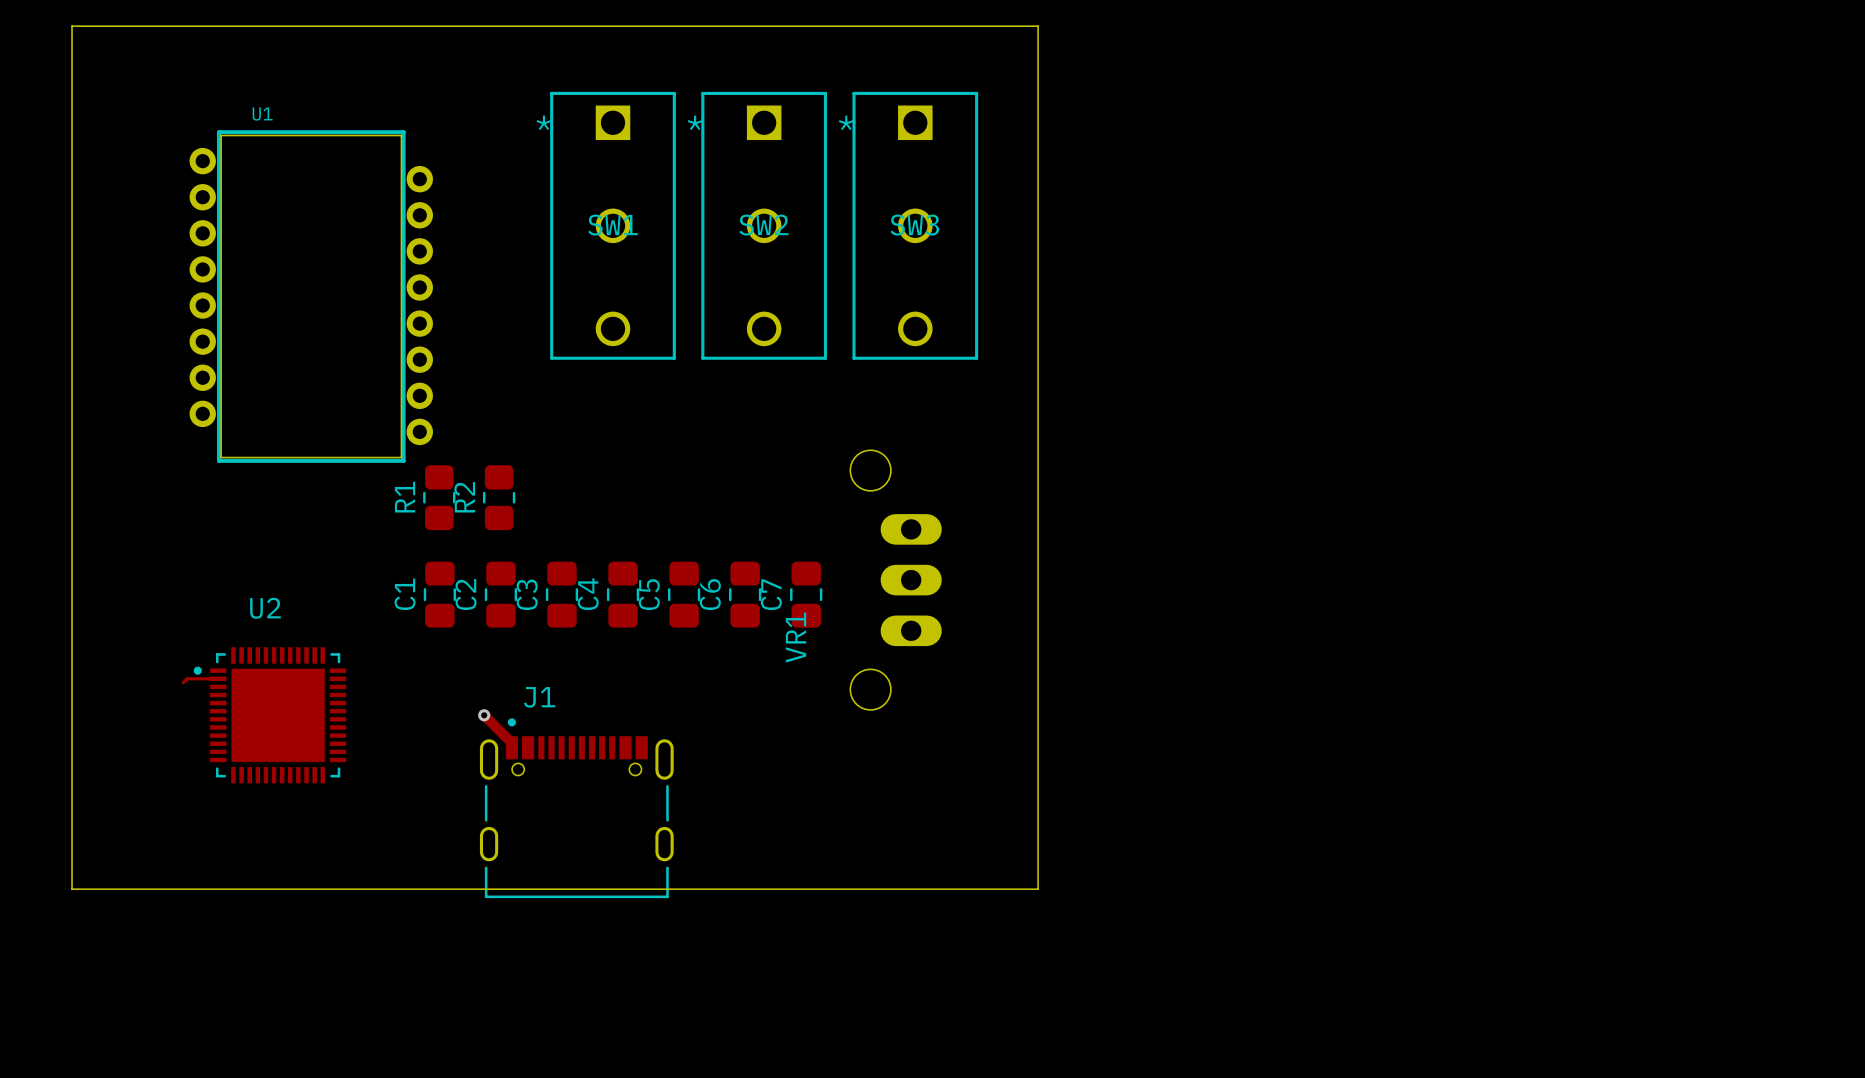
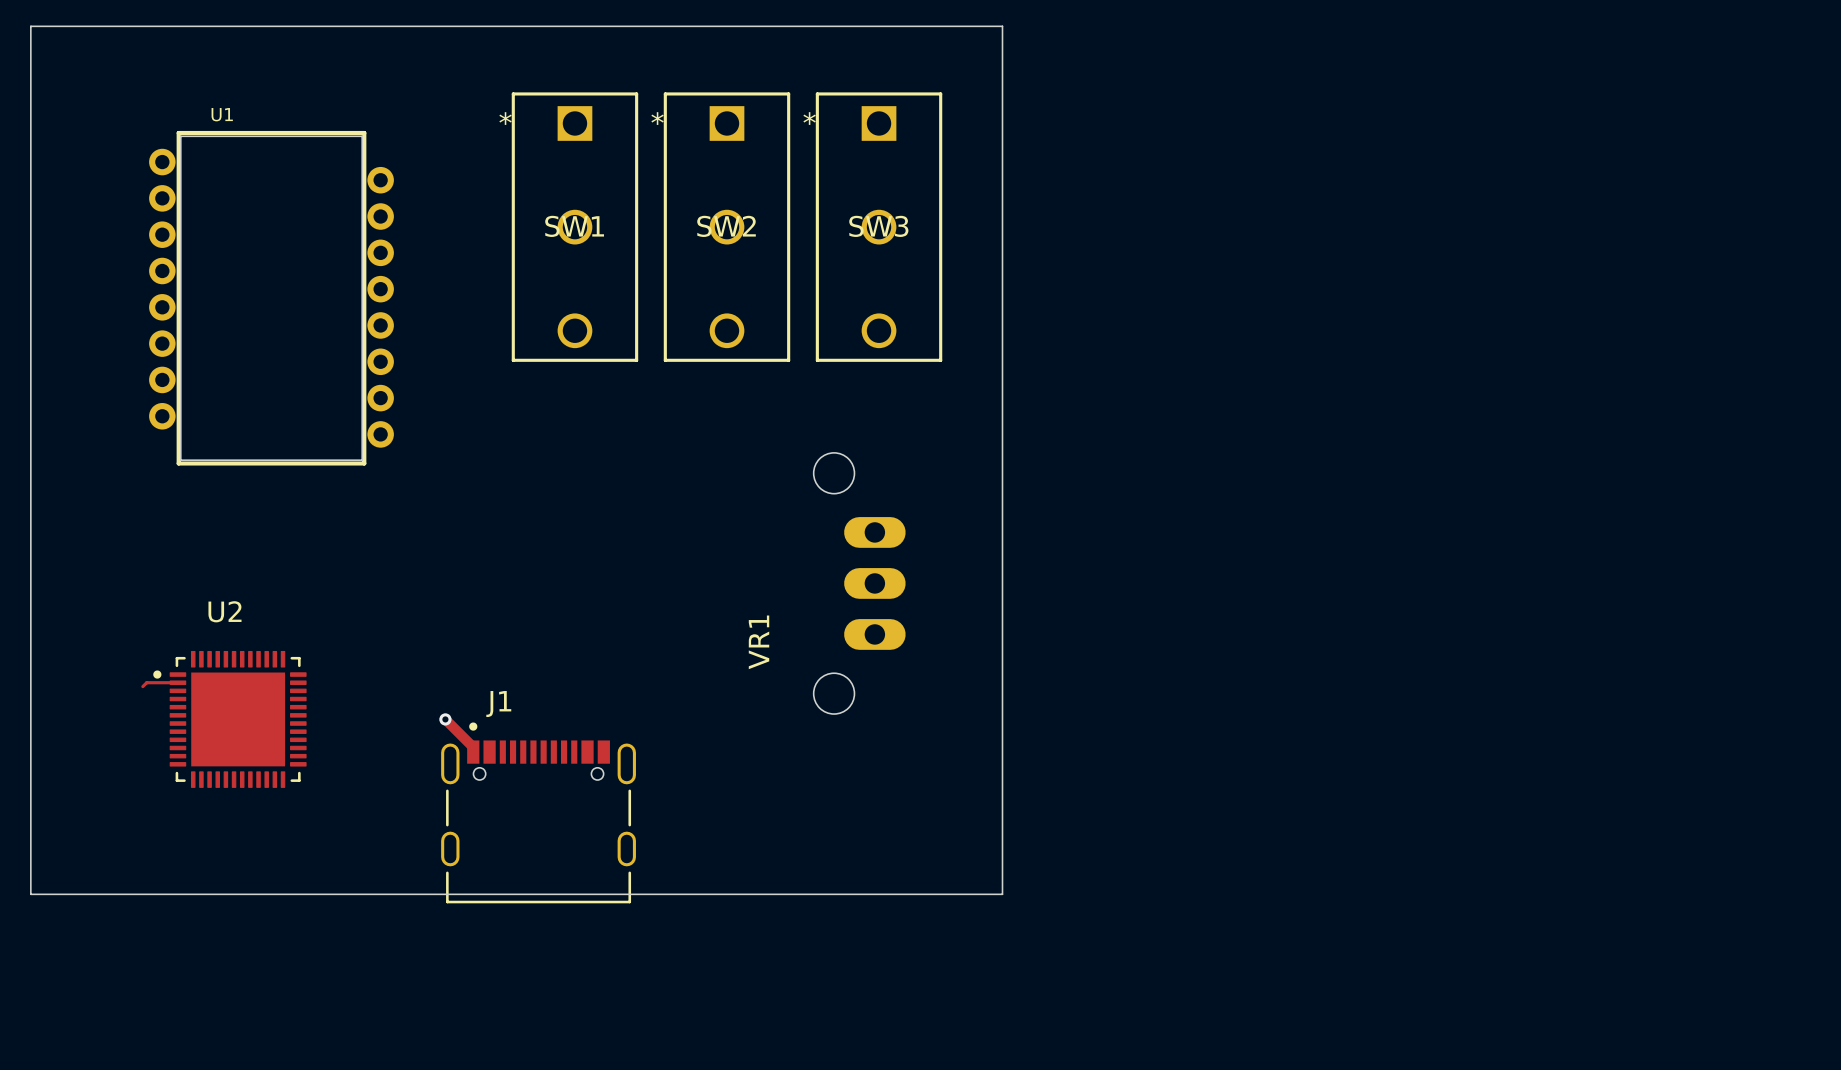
R1: (439, 497) -> none
R2: (499, 497) -> none
C1: (439, 594) -> none
C2: (500, 594) -> none
C3: (561, 594) -> none
C4: (623, 594) -> none
C5: (684, 594) -> none
C6: (745, 594) -> none
C7: (806, 594) -> none

